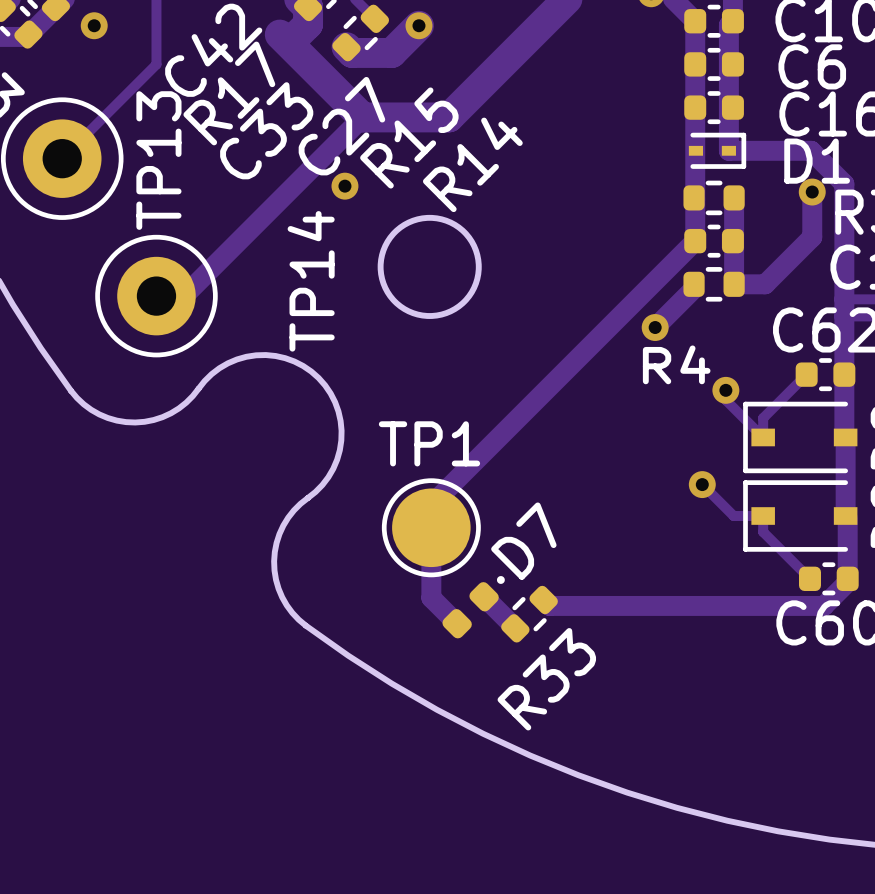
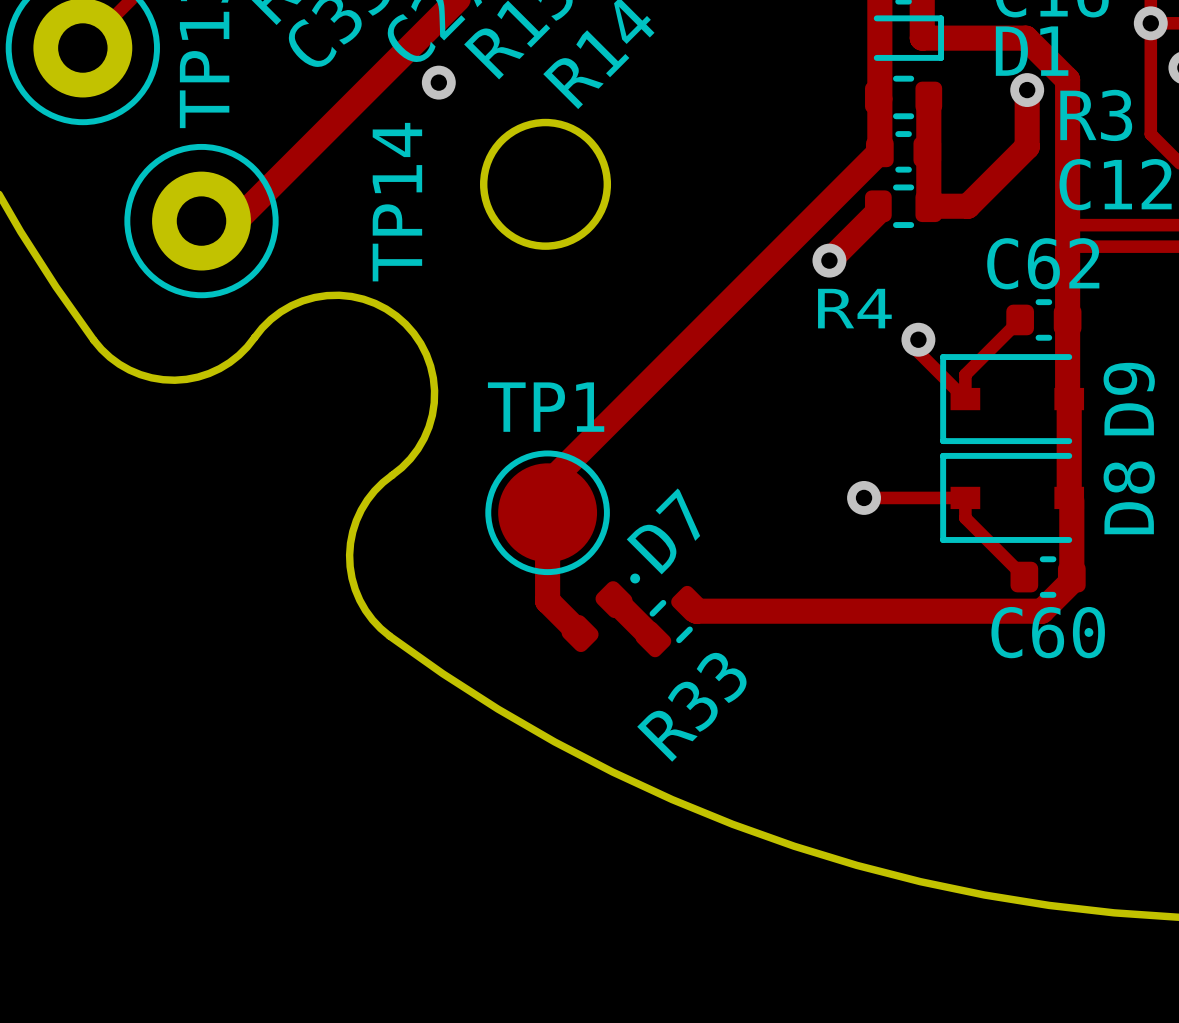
track: (702, 484) (733, 516) -> (864, 497) (928, 497)
via position: (702, 484) -> (864, 497)

